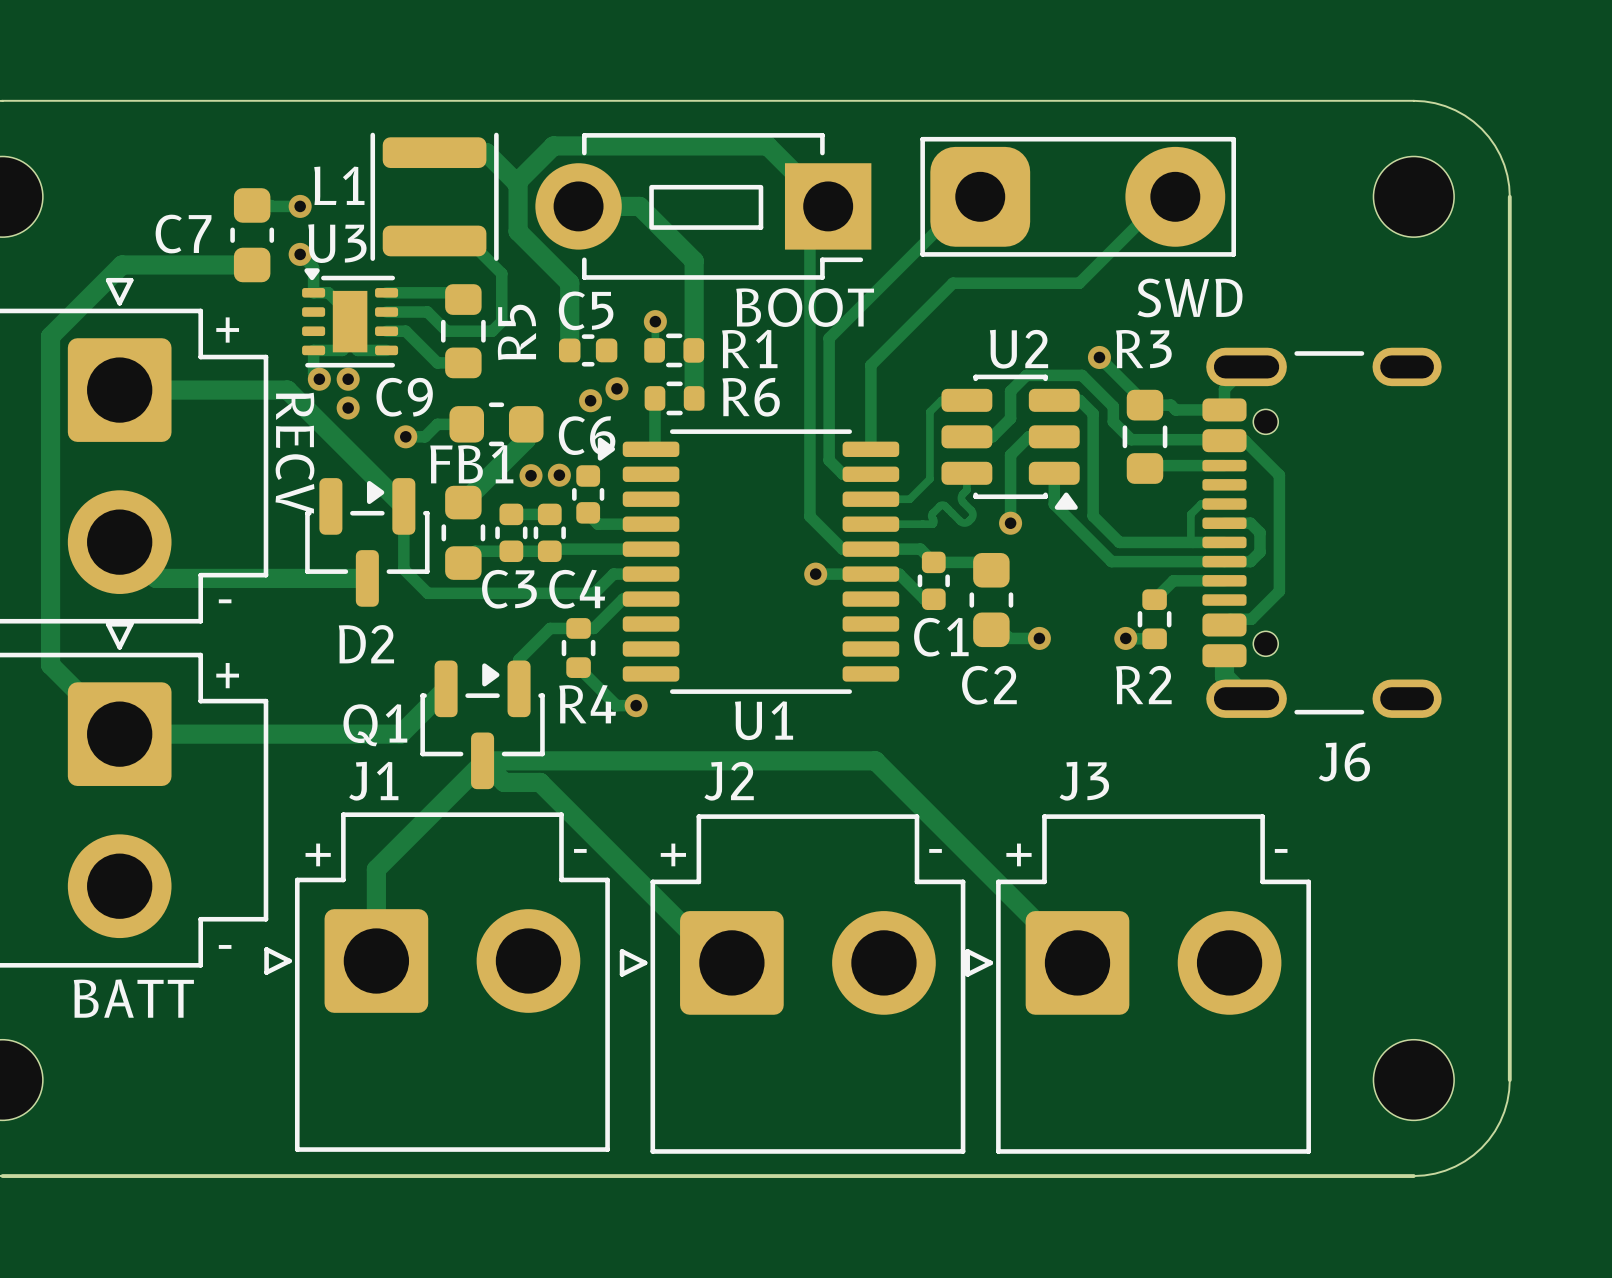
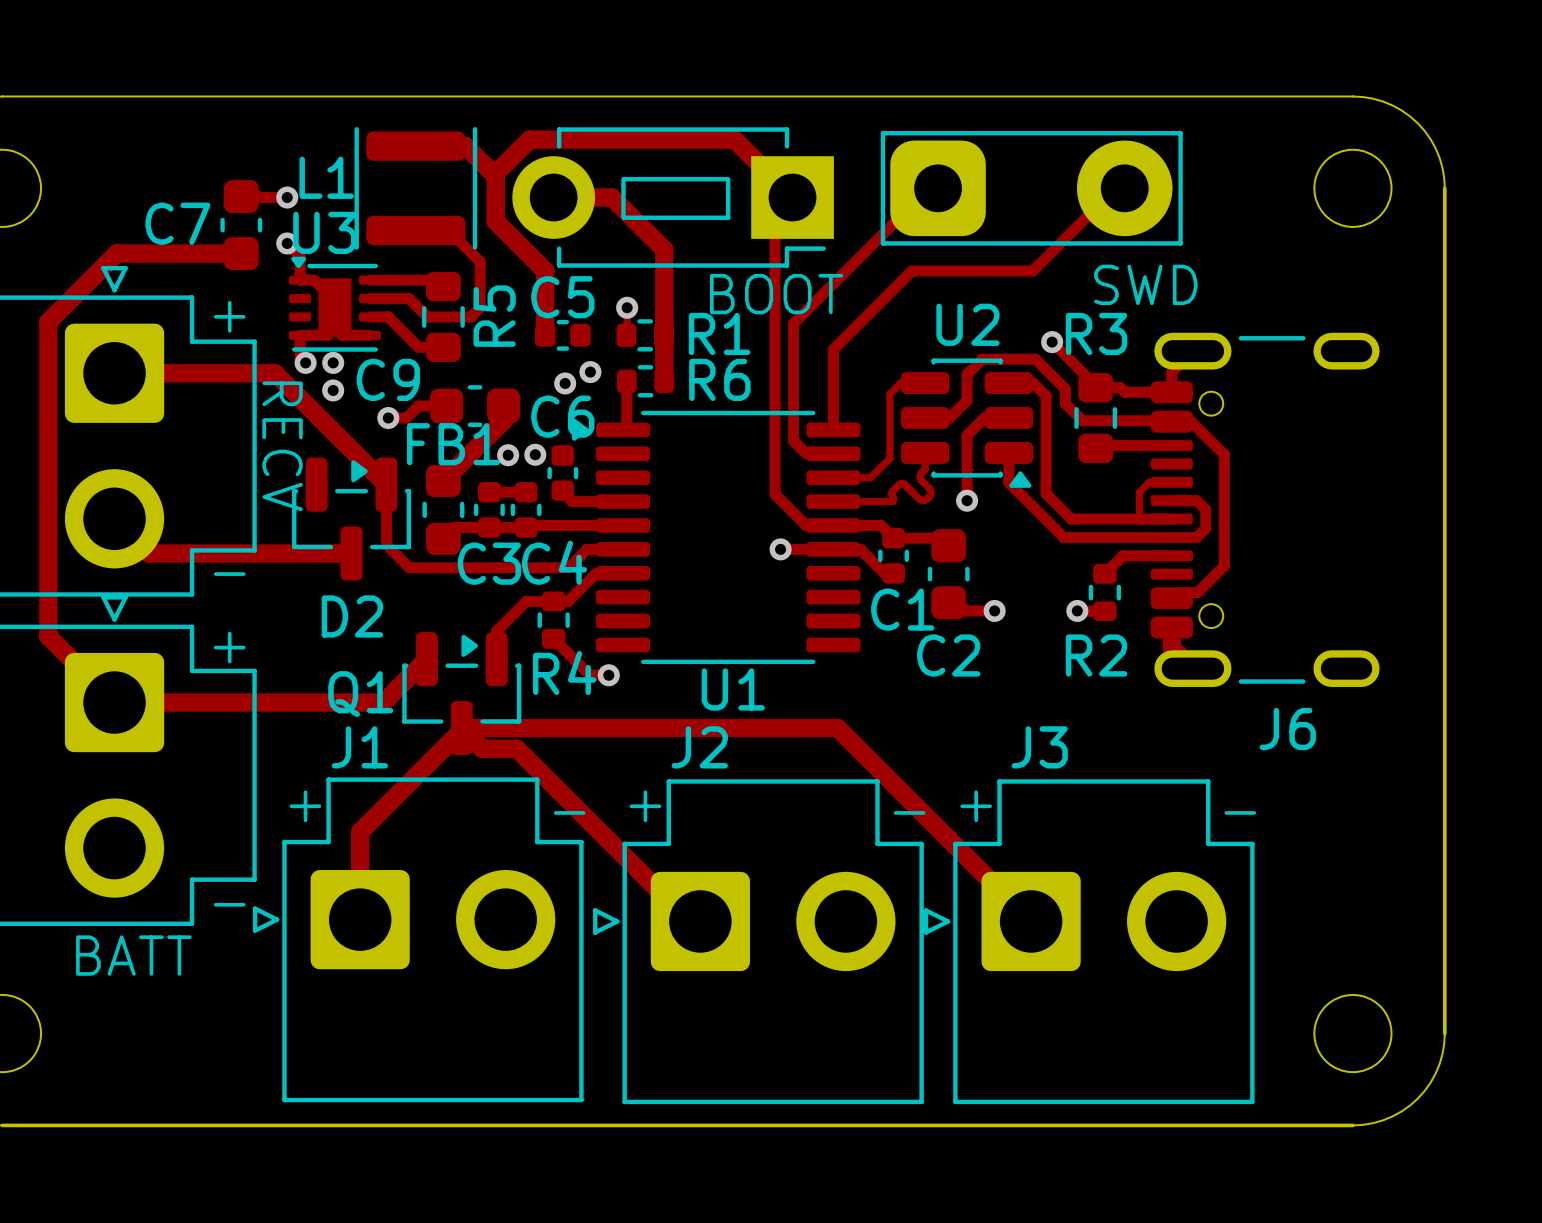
U2 name position: U2 (1018, 349) -> U2 (967, 324)

